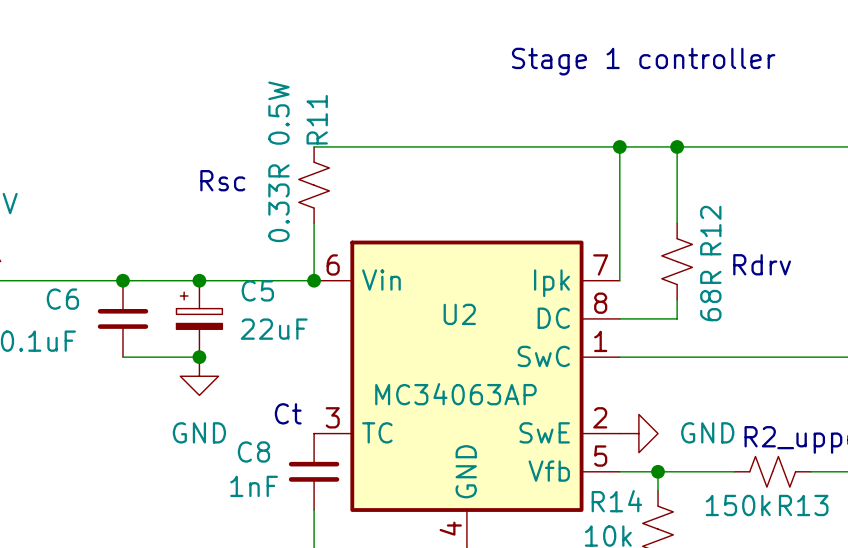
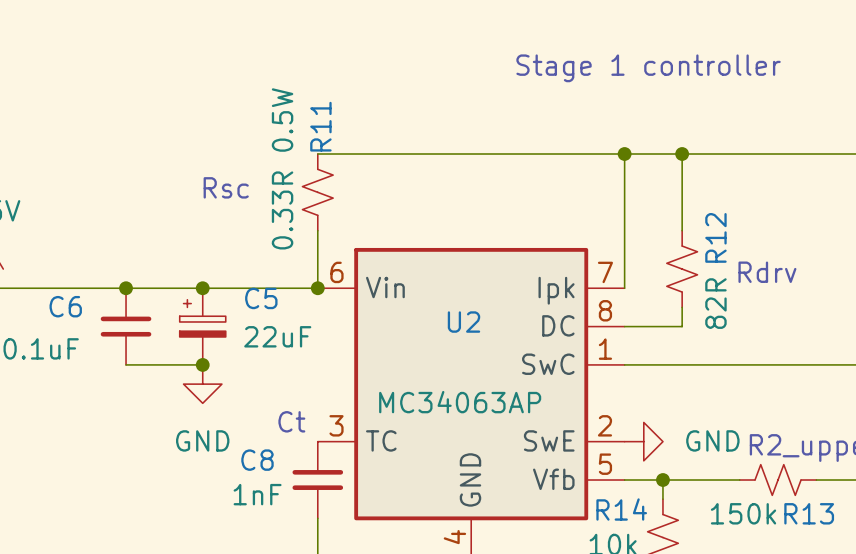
R12 value: 68R (710, 296) -> 82R (715, 303)

